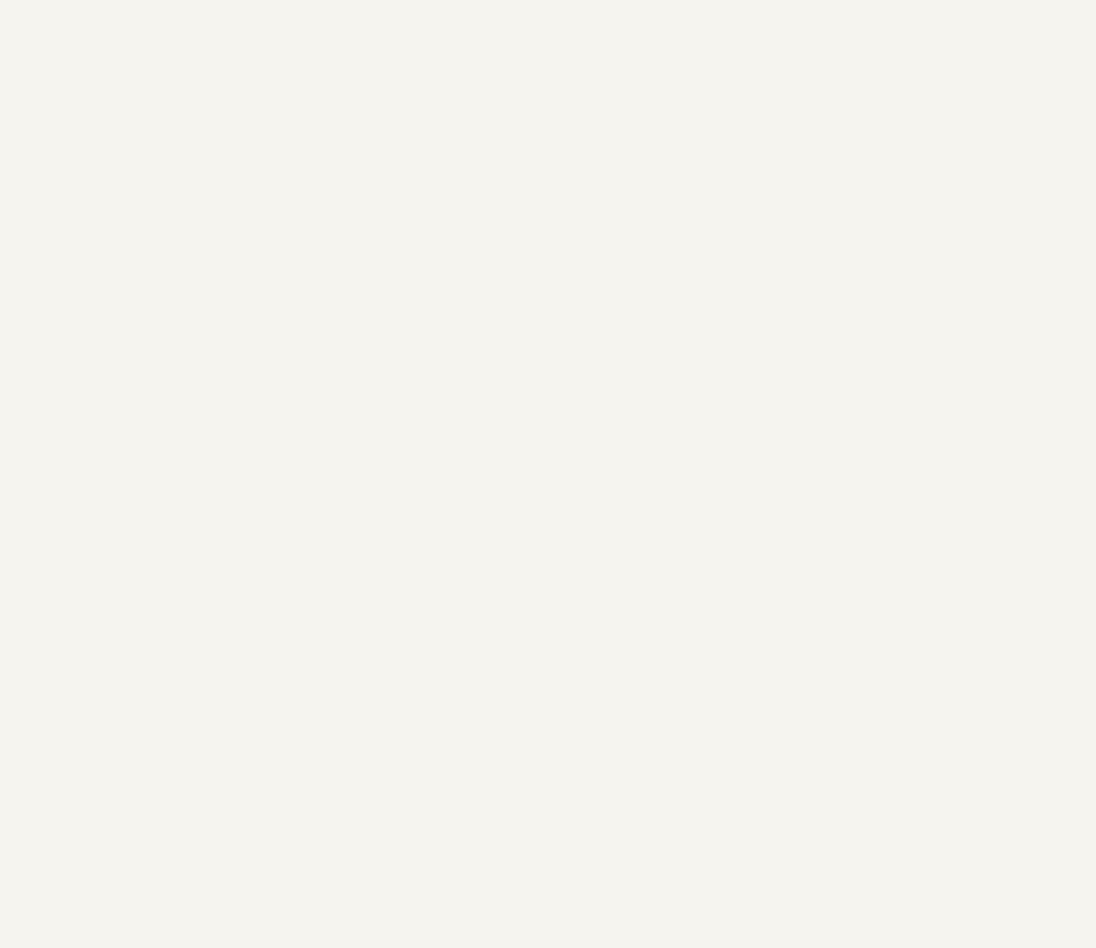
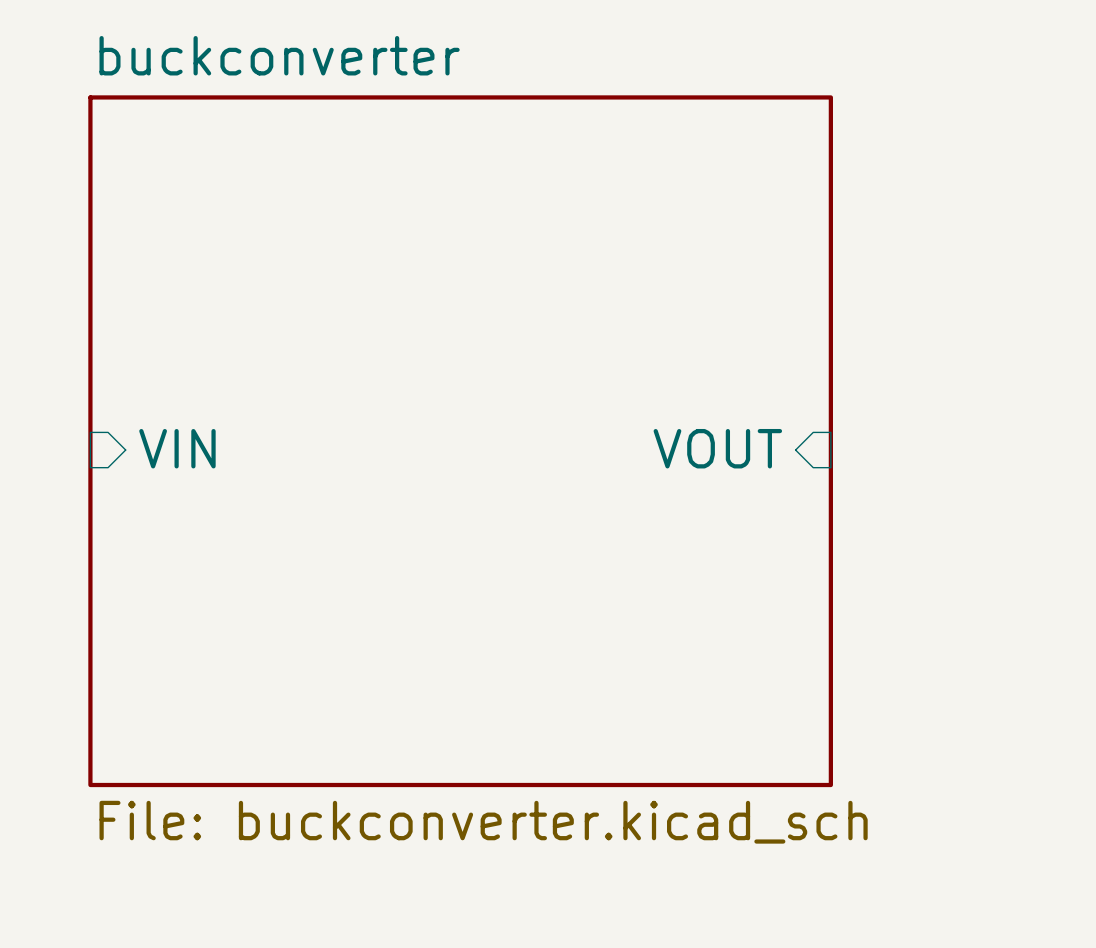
sheet buckconverter: none -> File: buckconverter.kicad_sch (460, 441)
sheet pin: none -> VIN (177, 448)
sheet pin: none -> VOUT (717, 448)

